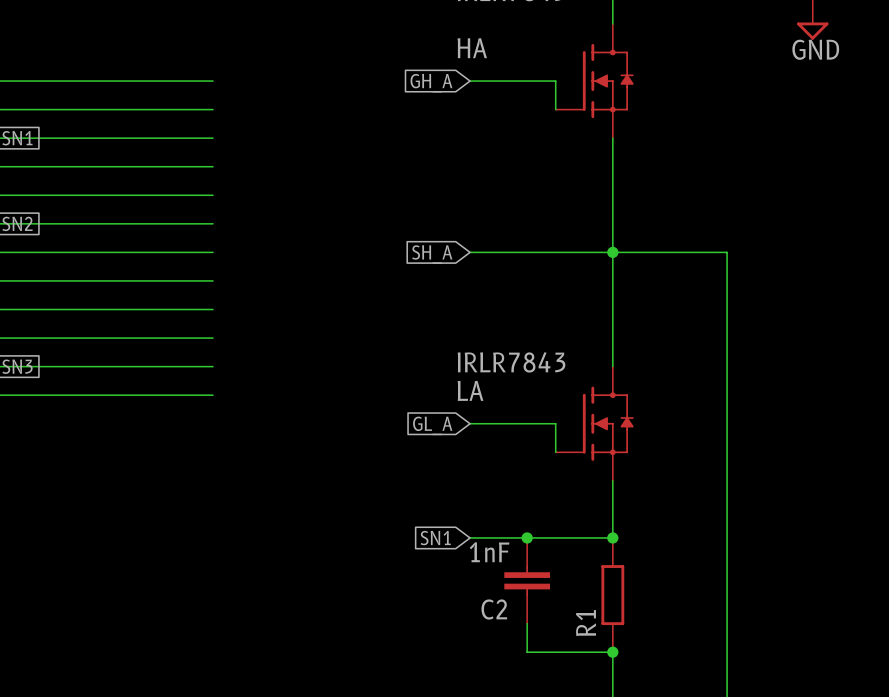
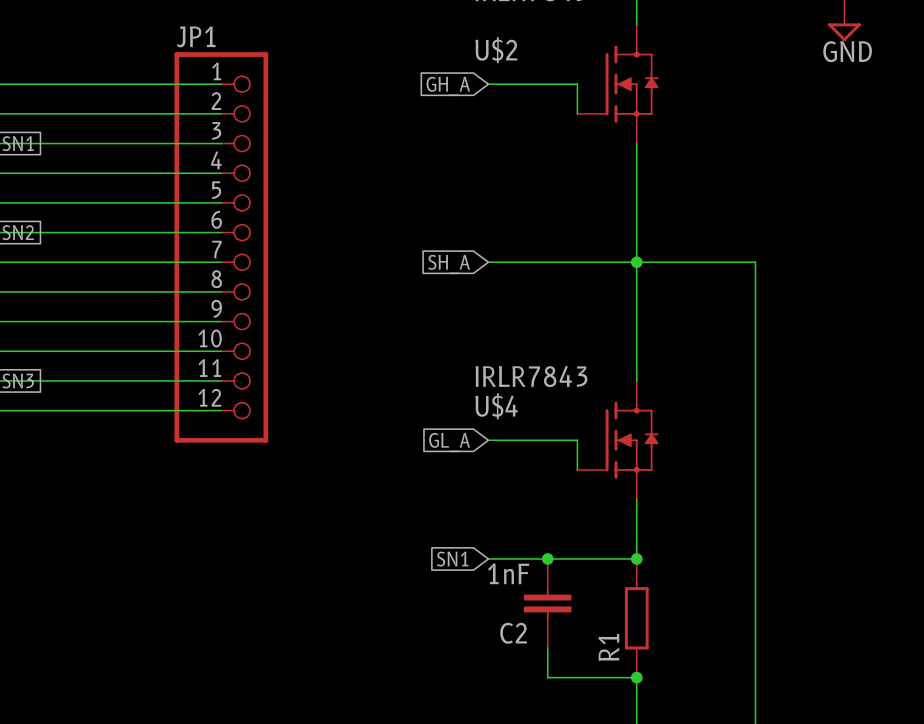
HA name: HA (472, 48) -> U$2 (496, 50)
JP1: none -> (221, 247)
LA name: LA (470, 390) -> U$4 (496, 406)

